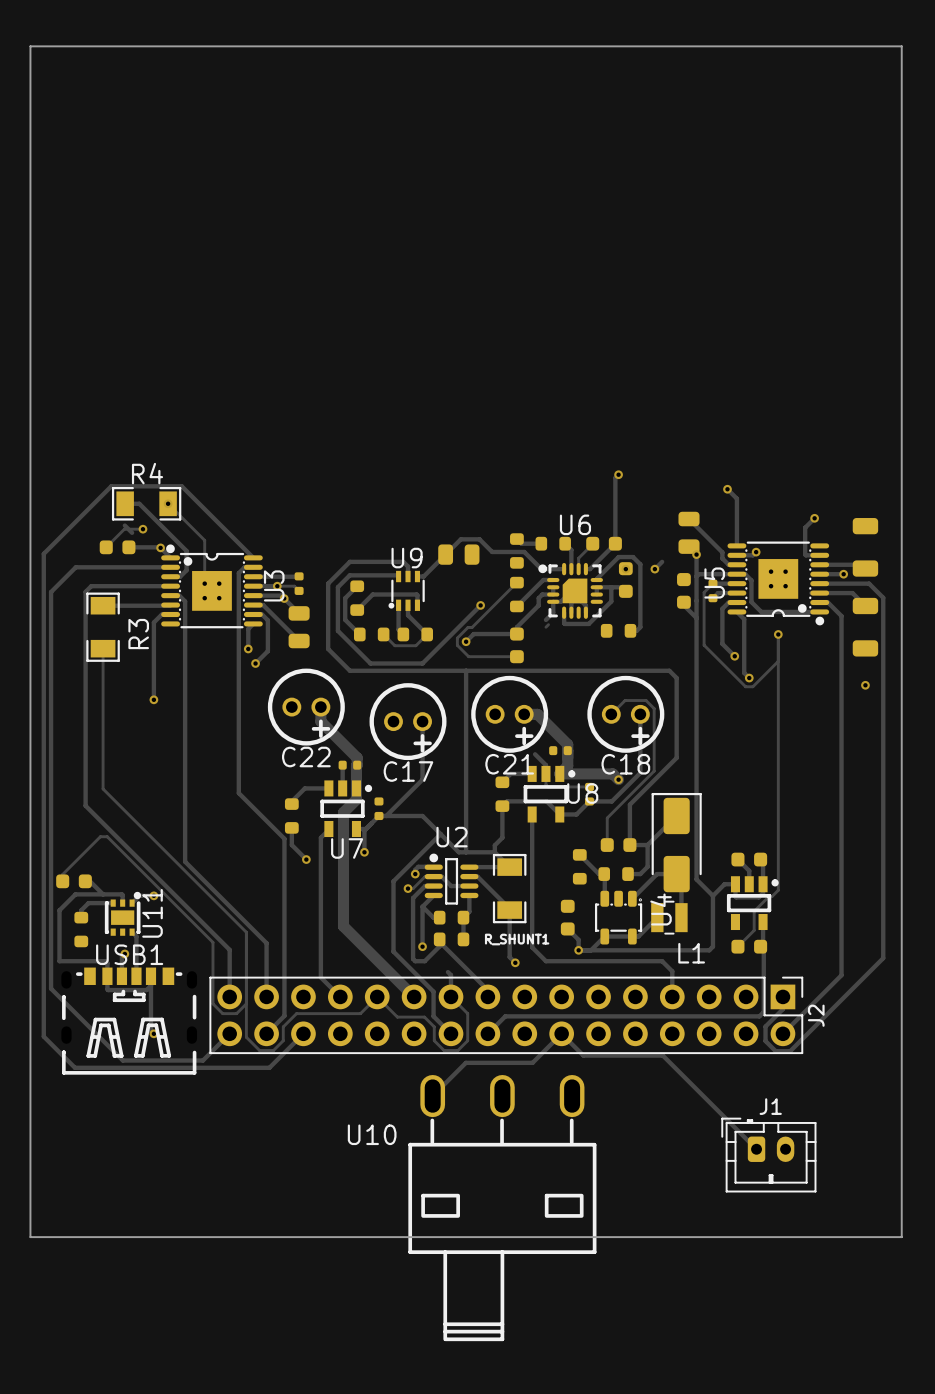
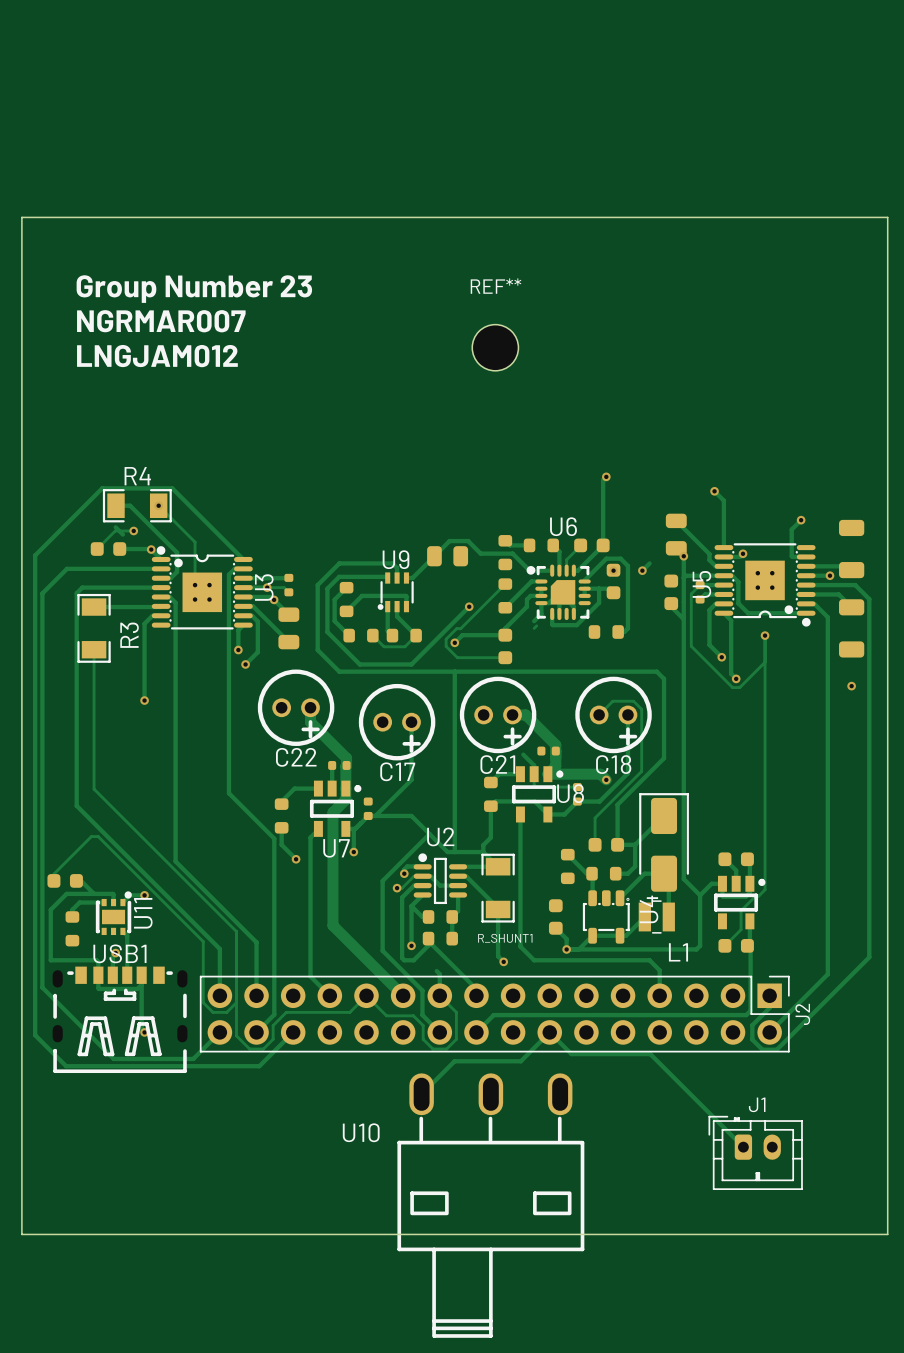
board edge: (30, 213) (30, 46) (901, 46) (901, 213) -> (21, 217) (887, 217)
text: none -> Group Number 23 (194, 289)
text: none -> NGRMAR007 (161, 321)
REF**: none -> (495, 347)
text: none -> LNGJAM012 (157, 356)

